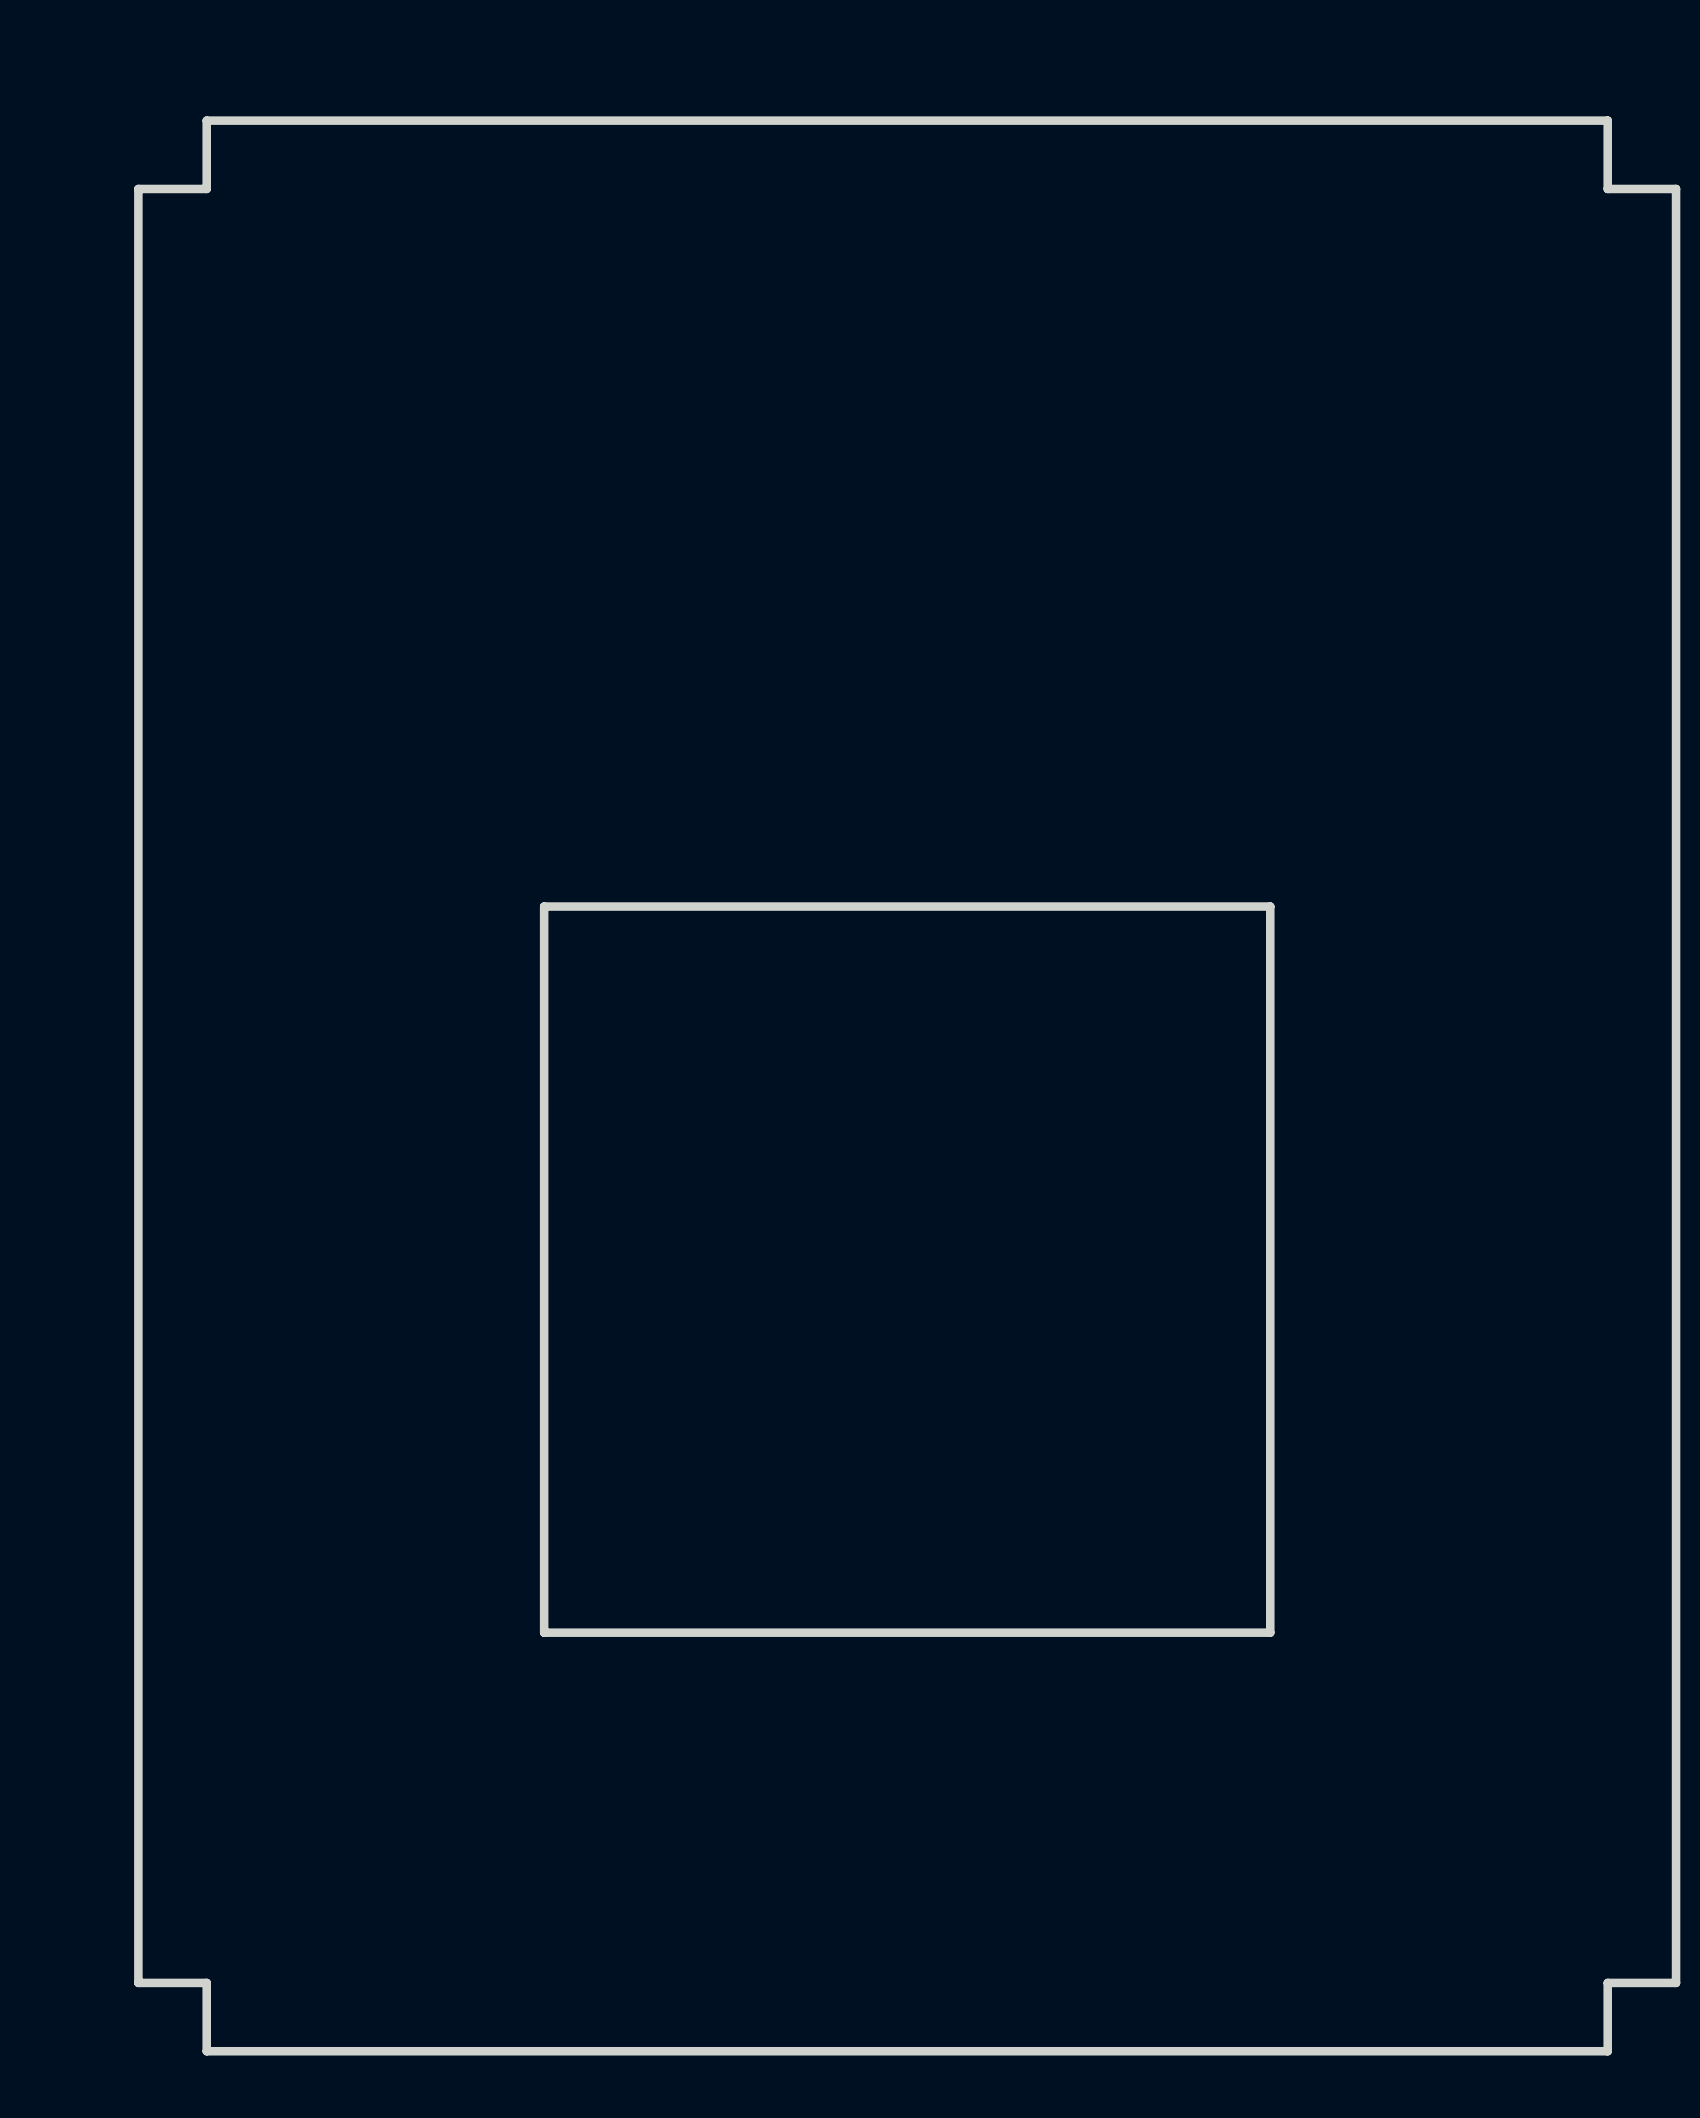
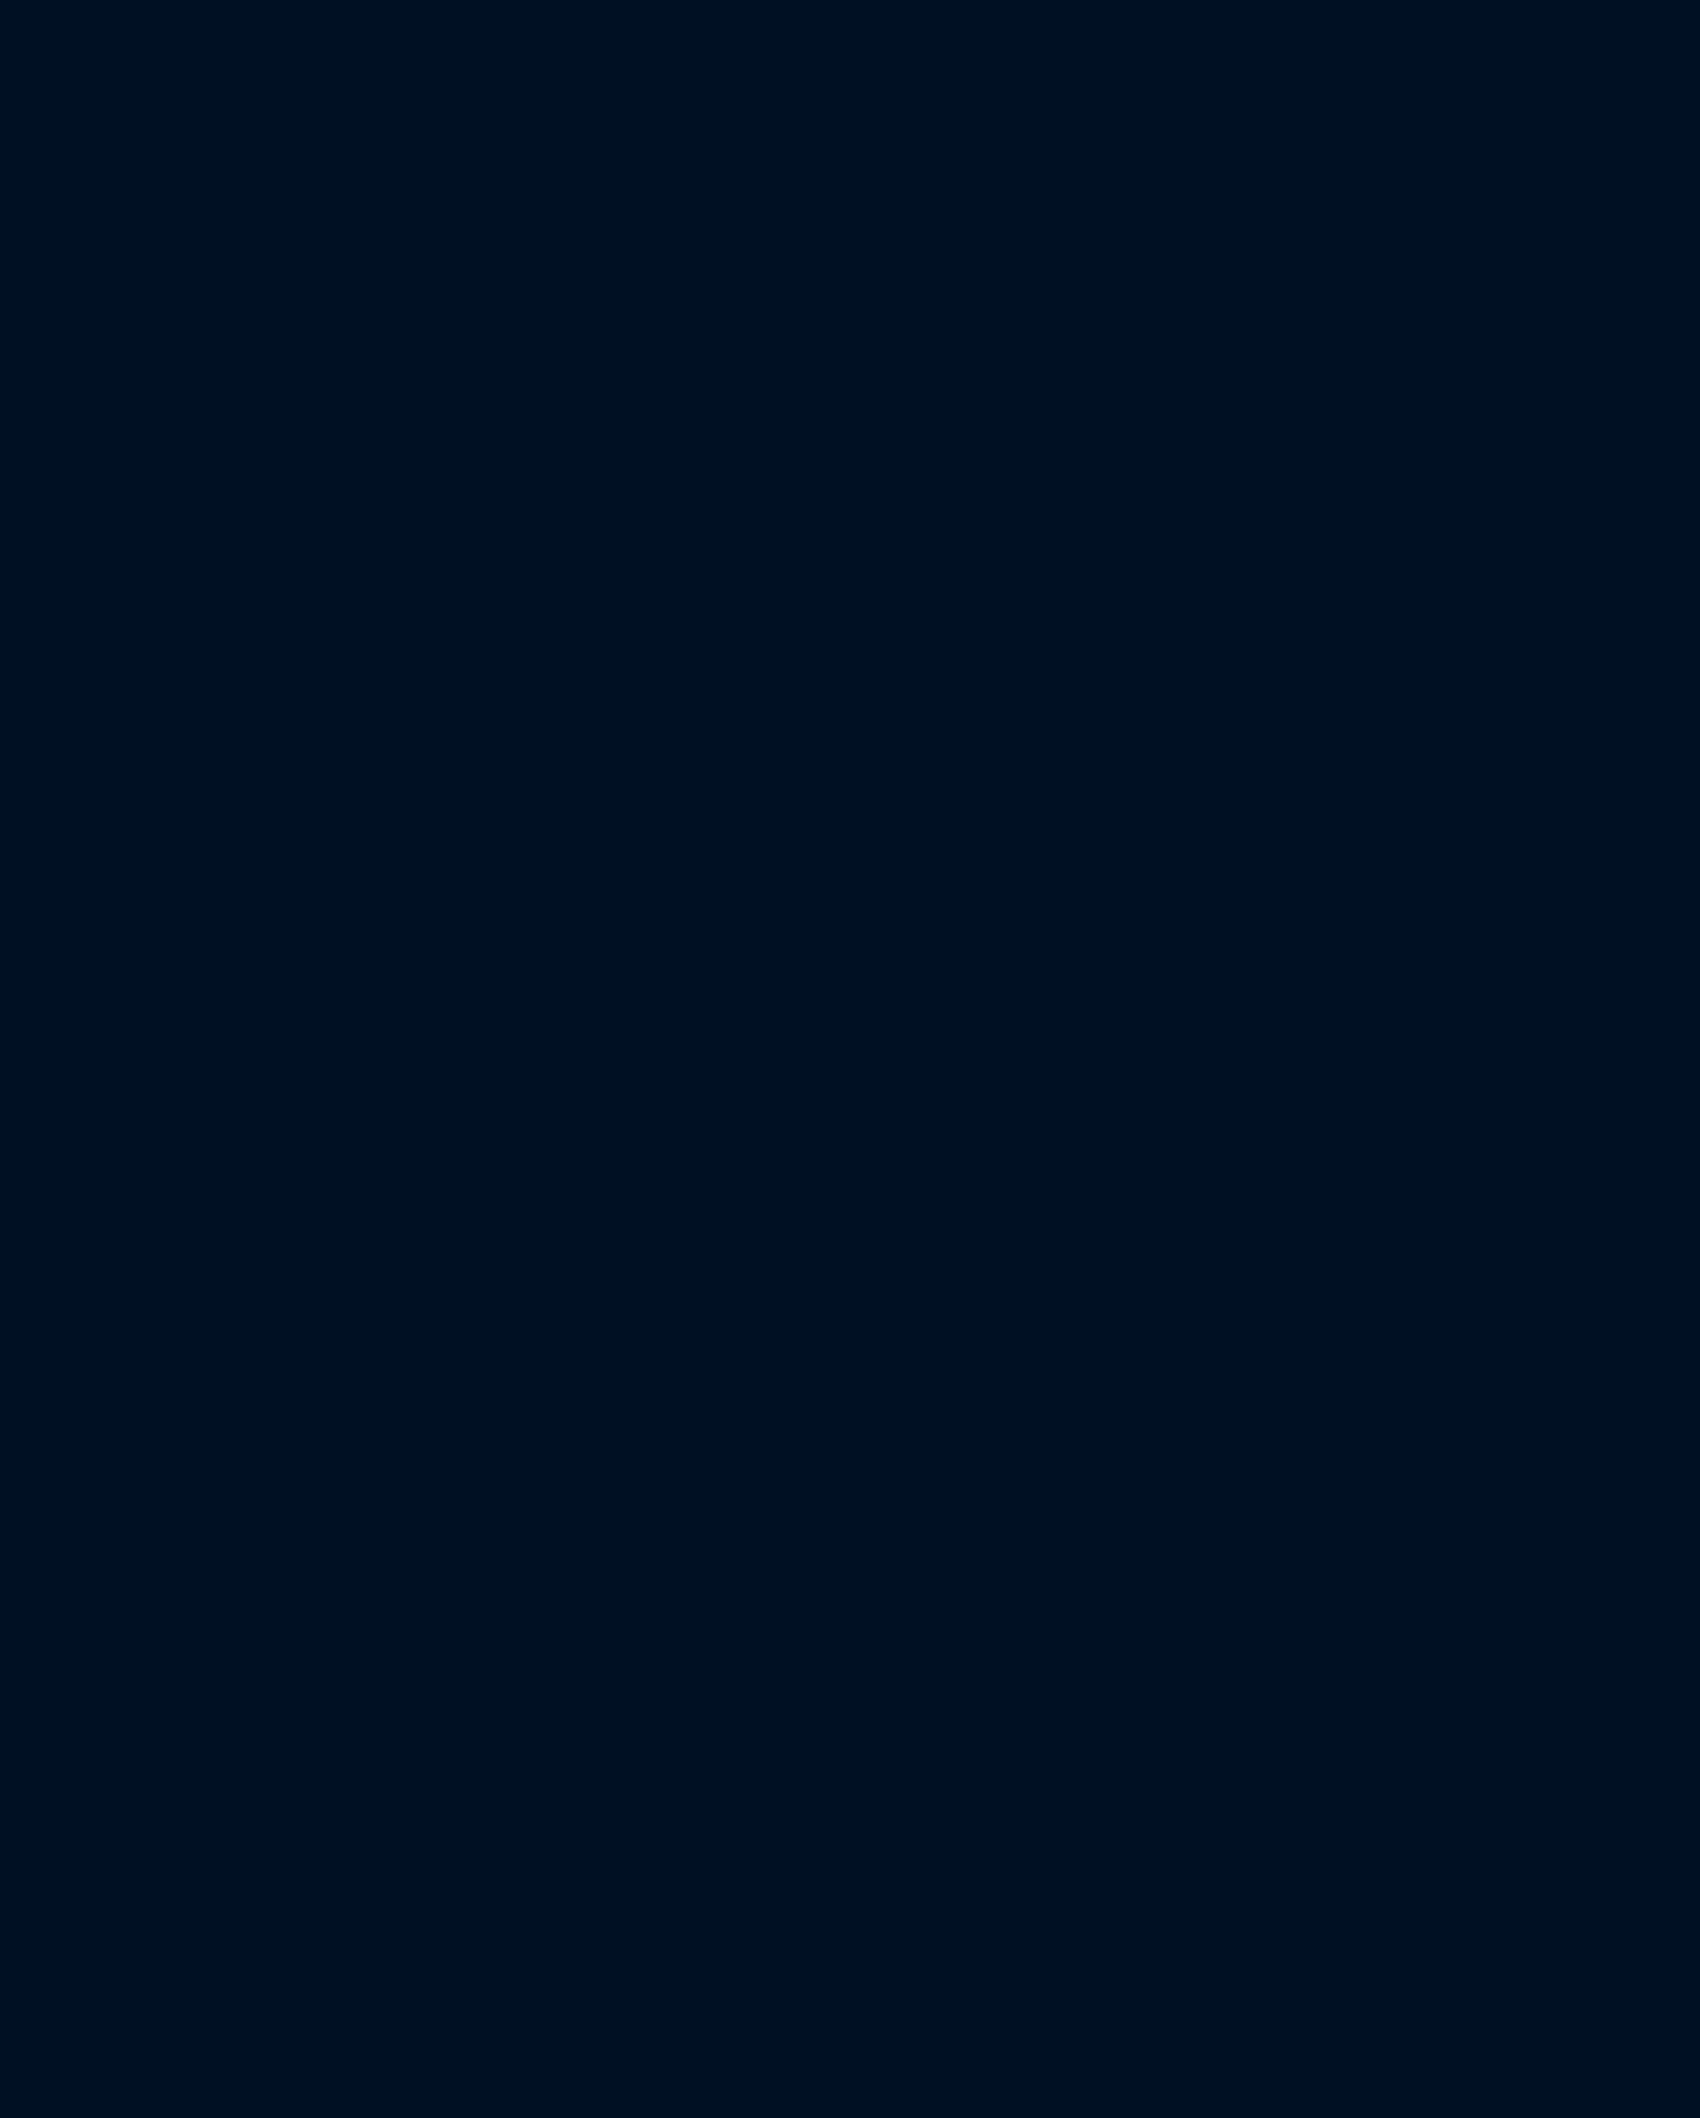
board edge: (206, 120) (206, 188) (138, 188) (138, 1982) (206, 1982) (206, 2051) (1607, 2051) (1607, 1982) (1676, 1982) (1676, 188) (1607, 188) (1607, 120) (206, 120) -> none
board edge: (544, 906) (1270, 906) (1270, 1632) (544, 1632) (544, 906) -> none

